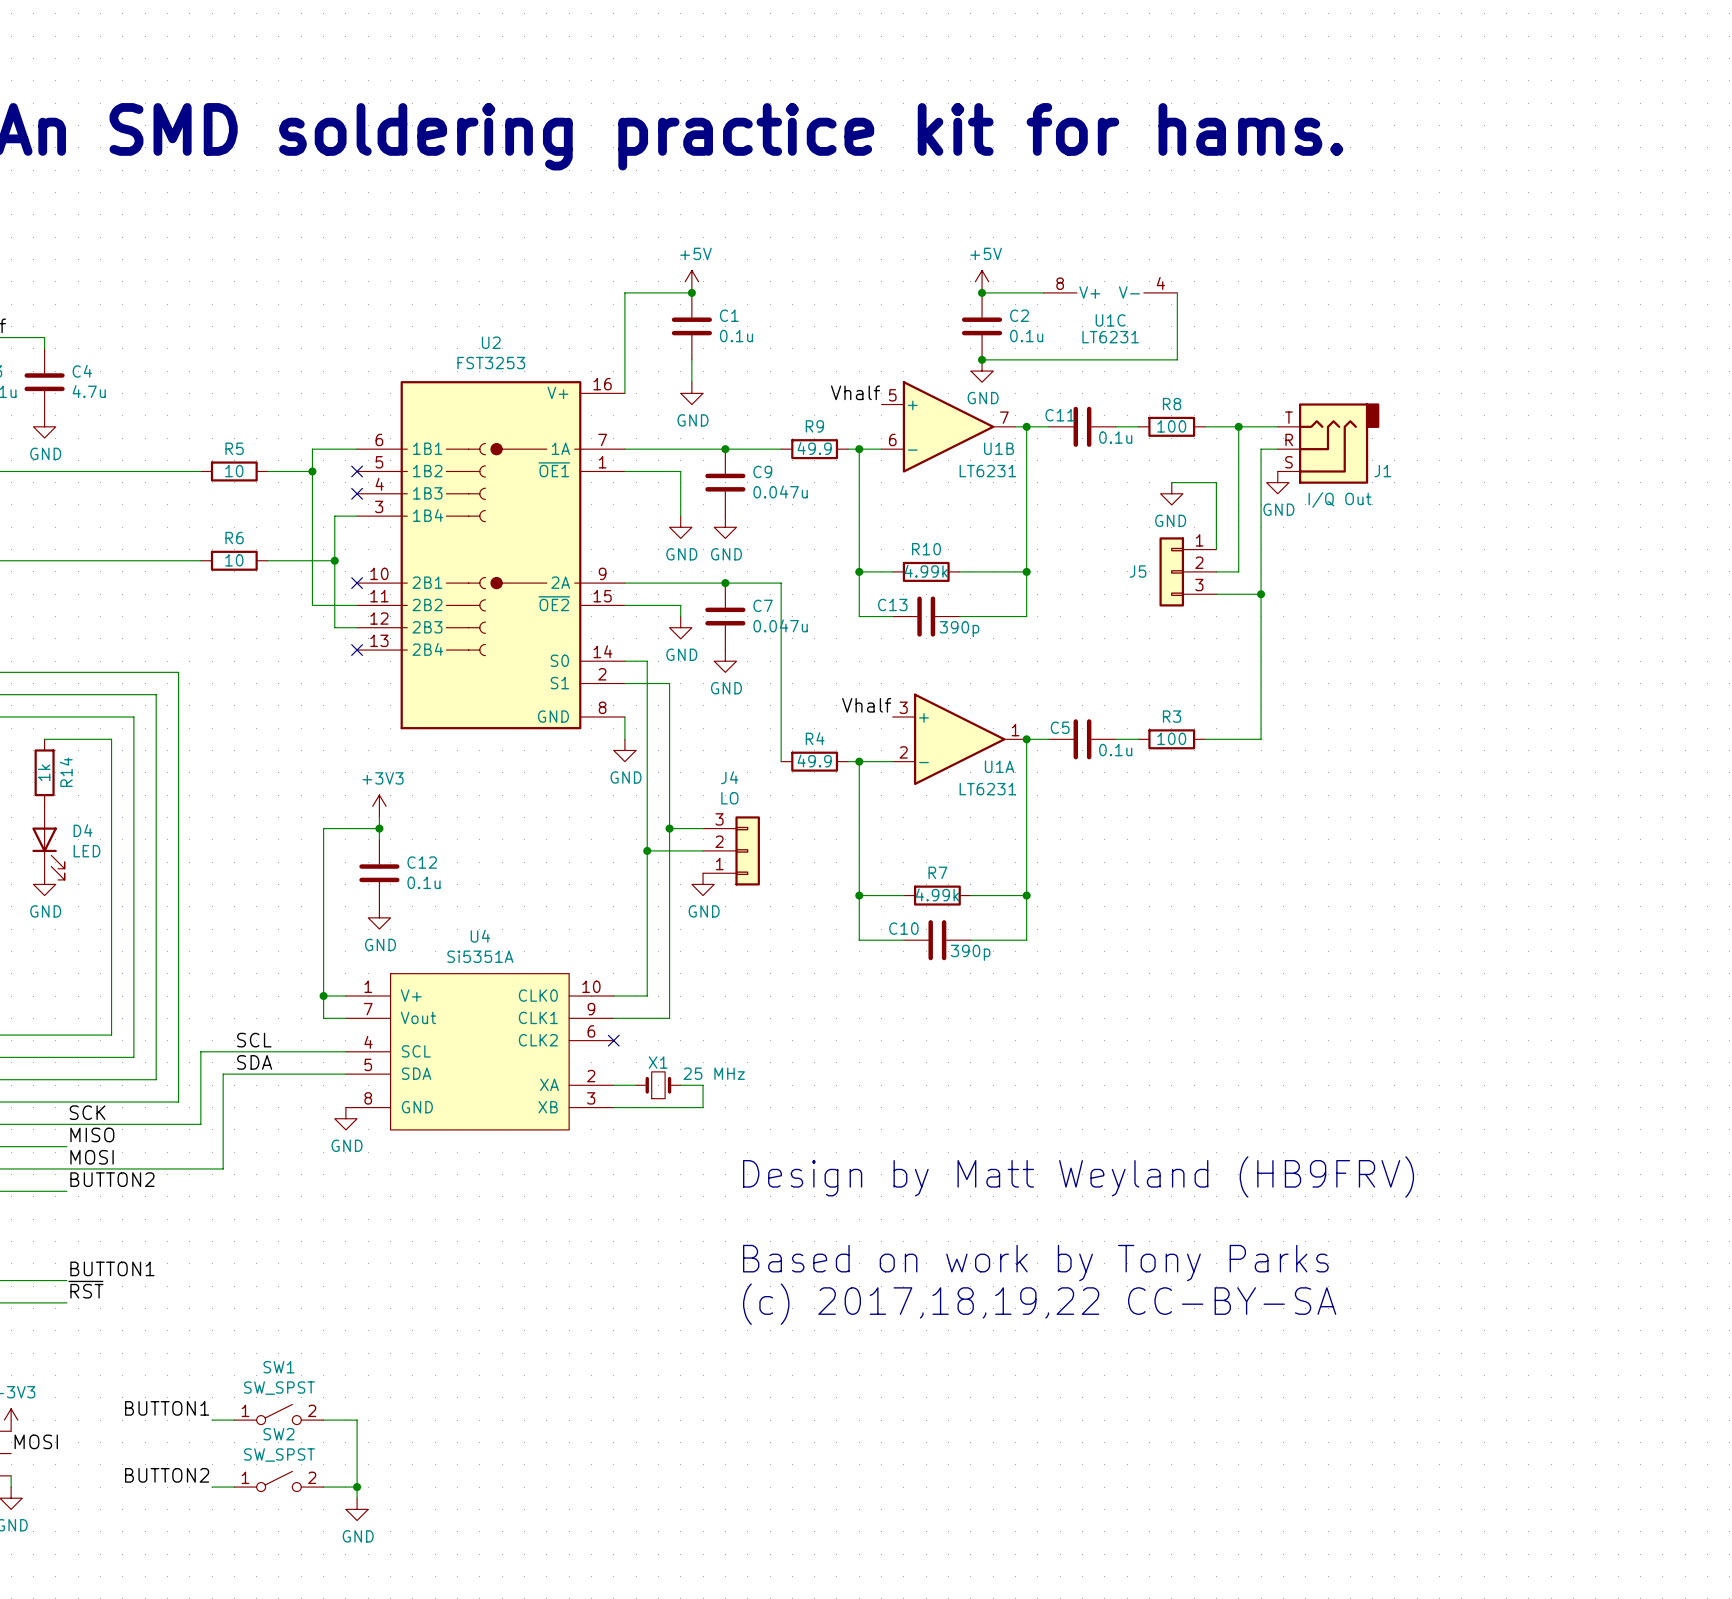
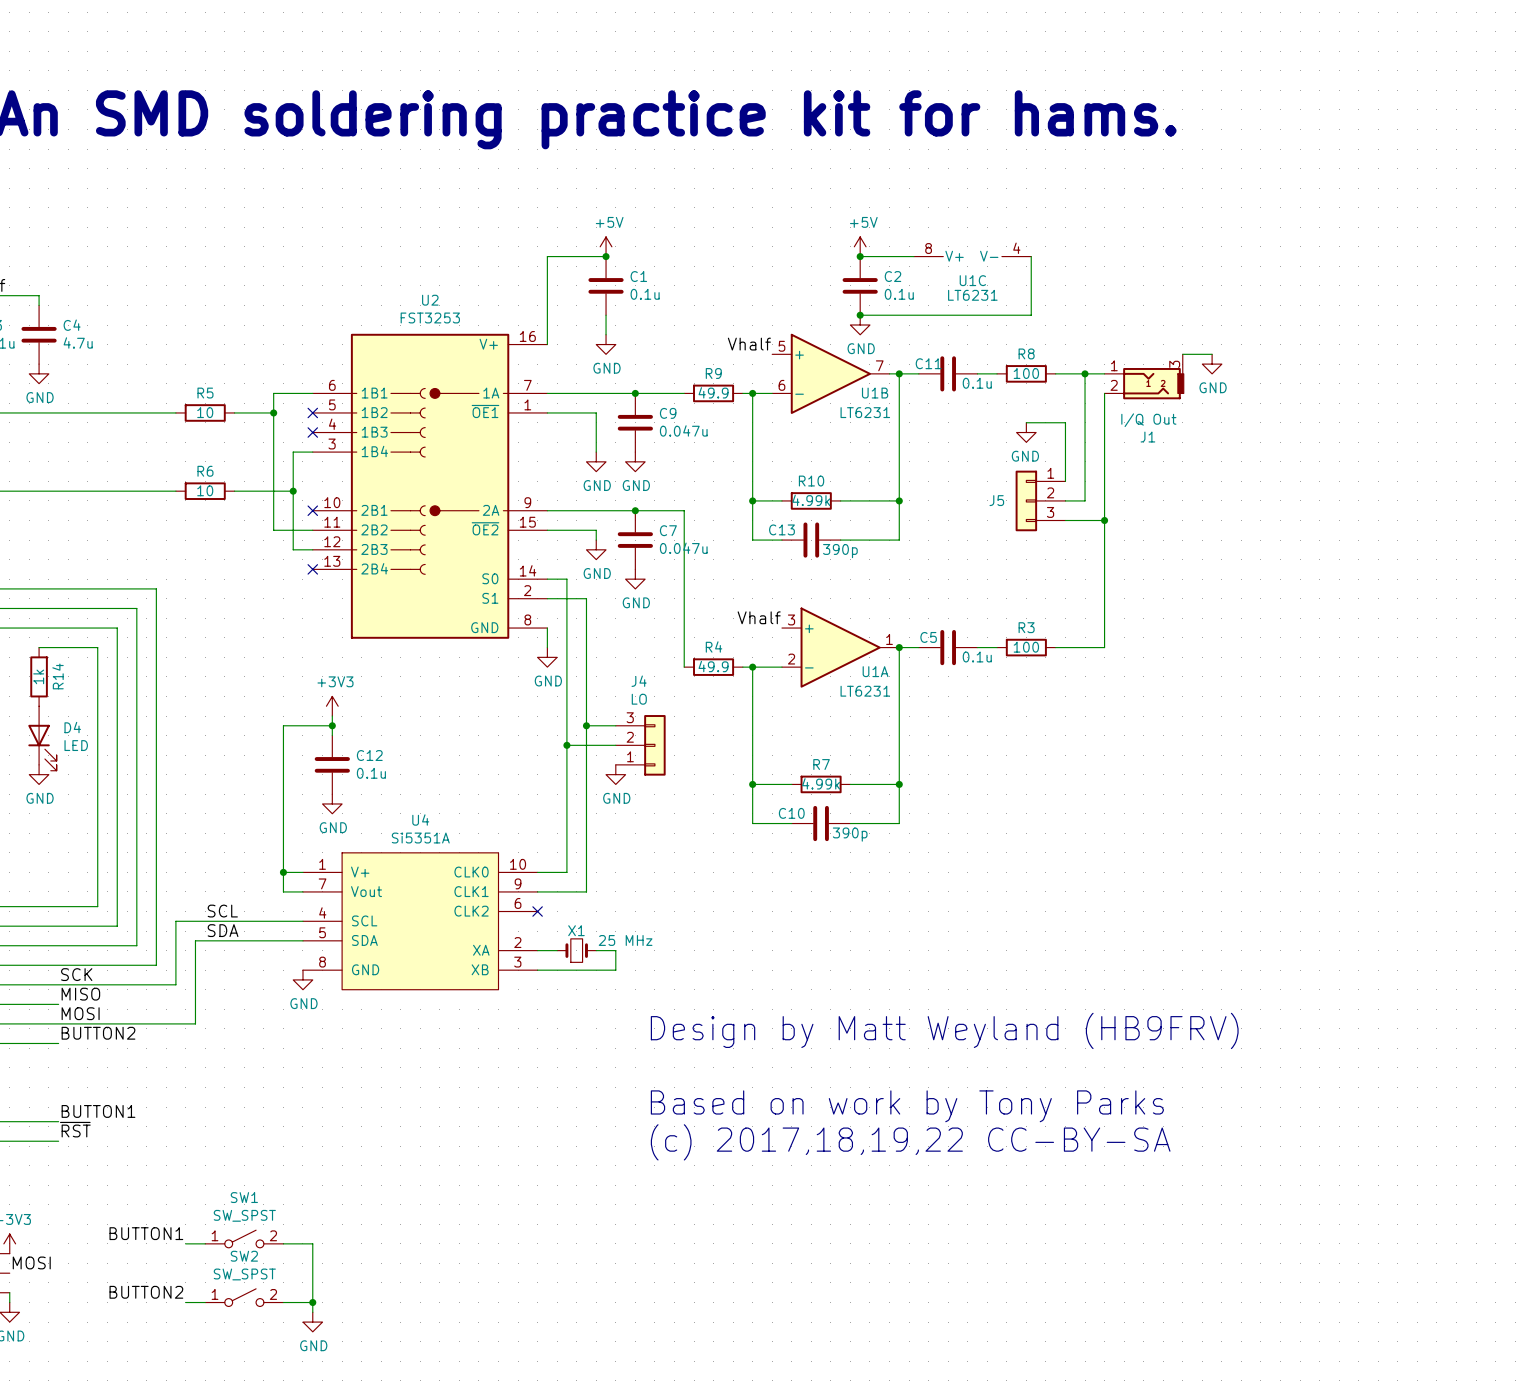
J1 symbol: [1277, 403, 1380, 484] -> [1104, 354, 1184, 400]
J1 name position: J1 (1382, 471) -> J1 (1147, 437)
power symbol position: GND (1277, 482) -> GND (1212, 364)

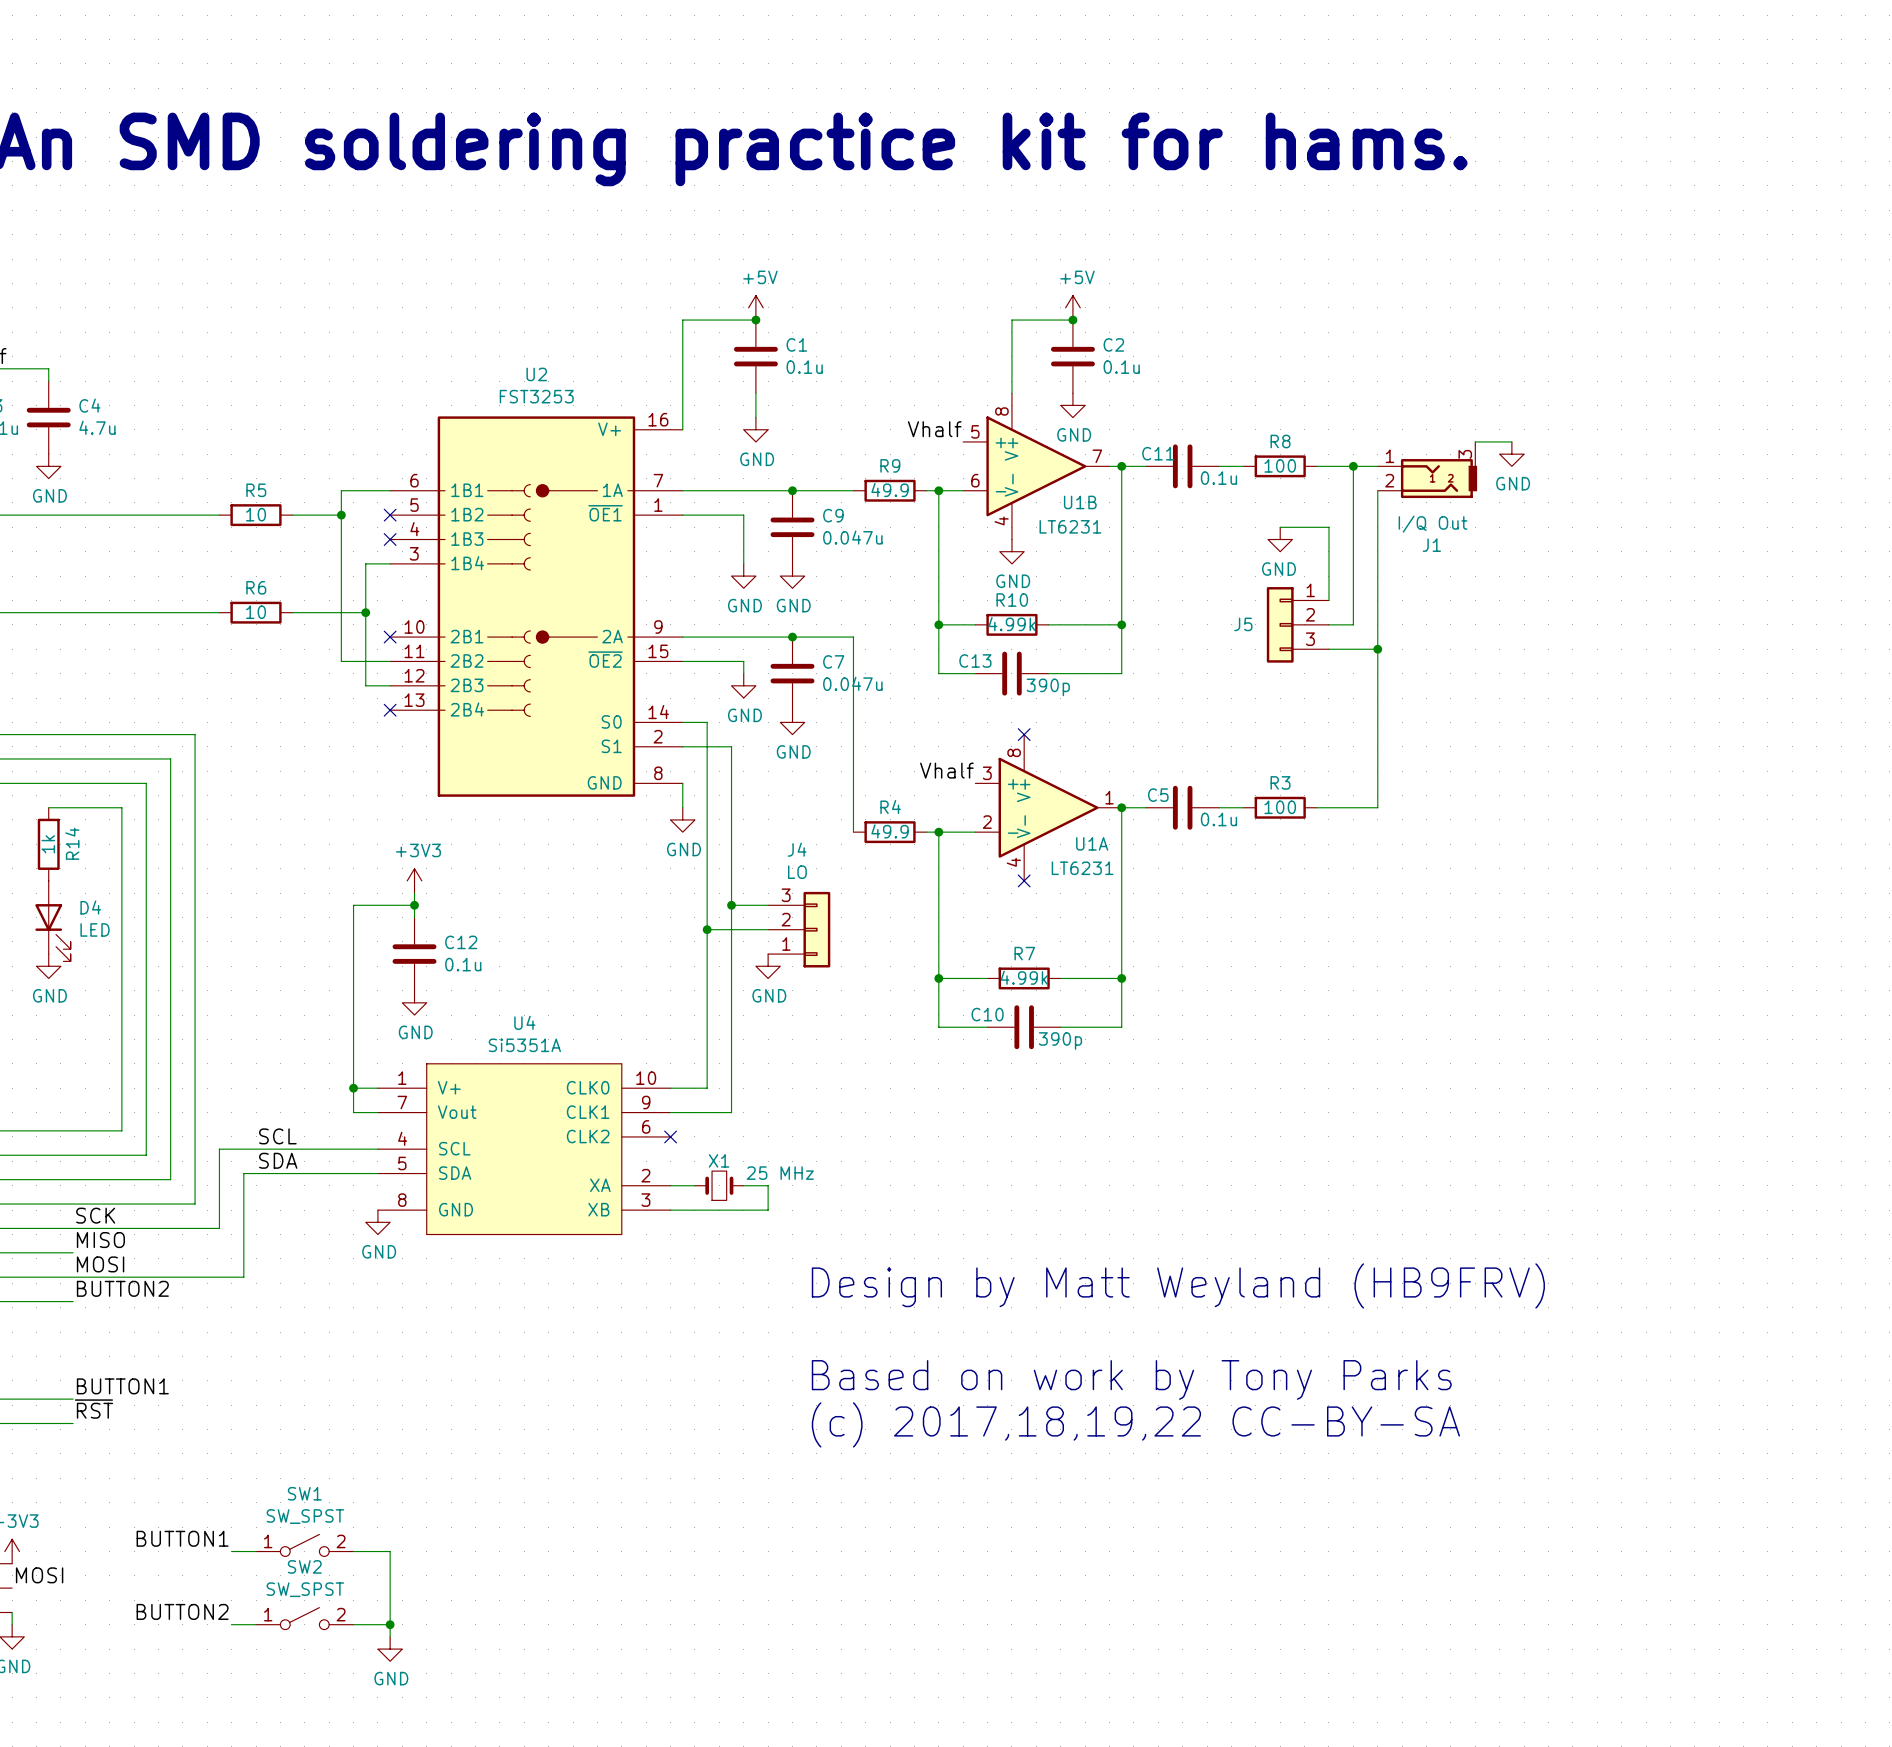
wire: (860, 256) (913, 256) -> (1072, 320) (1011, 320) (1011, 393)
U1C: LT6231 (972, 256) -> none
wire: (1031, 256) (1031, 315) (860, 315) -> none
junction: (860, 315) -> none
U1B symbol: [772, 333, 890, 414] -> [963, 393, 1110, 540]
power symbol: none -> GND (1011, 551)
no-connect mark: none -> (1024, 734)
U1A symbol: [781, 607, 900, 688] -> [975, 734, 1122, 881]
no-connect mark: none -> (1024, 880)

